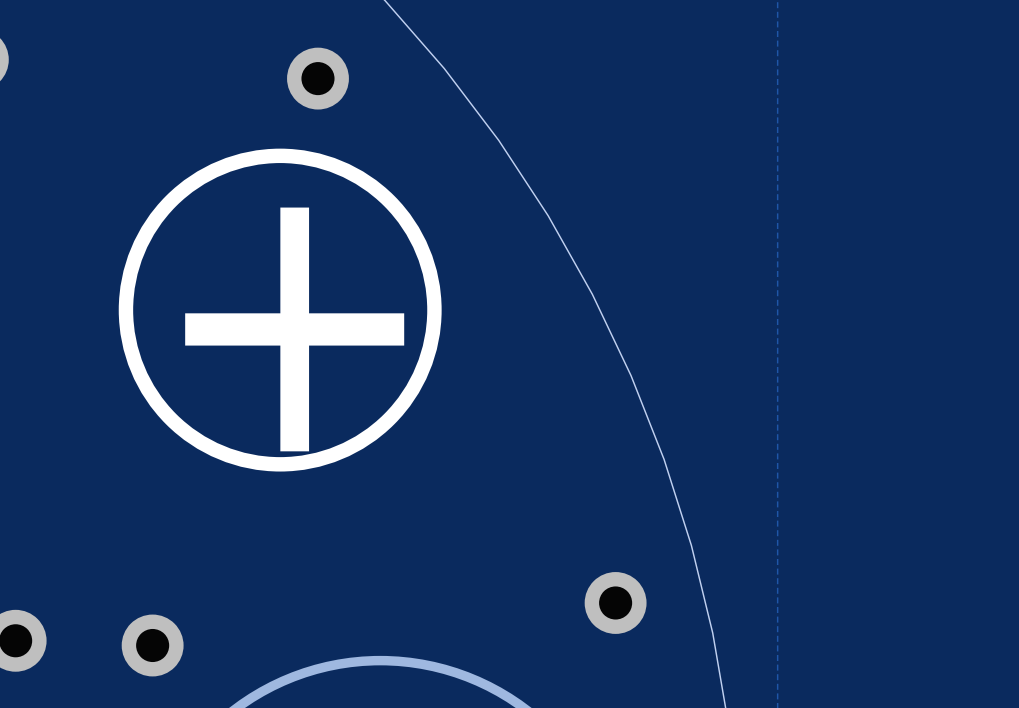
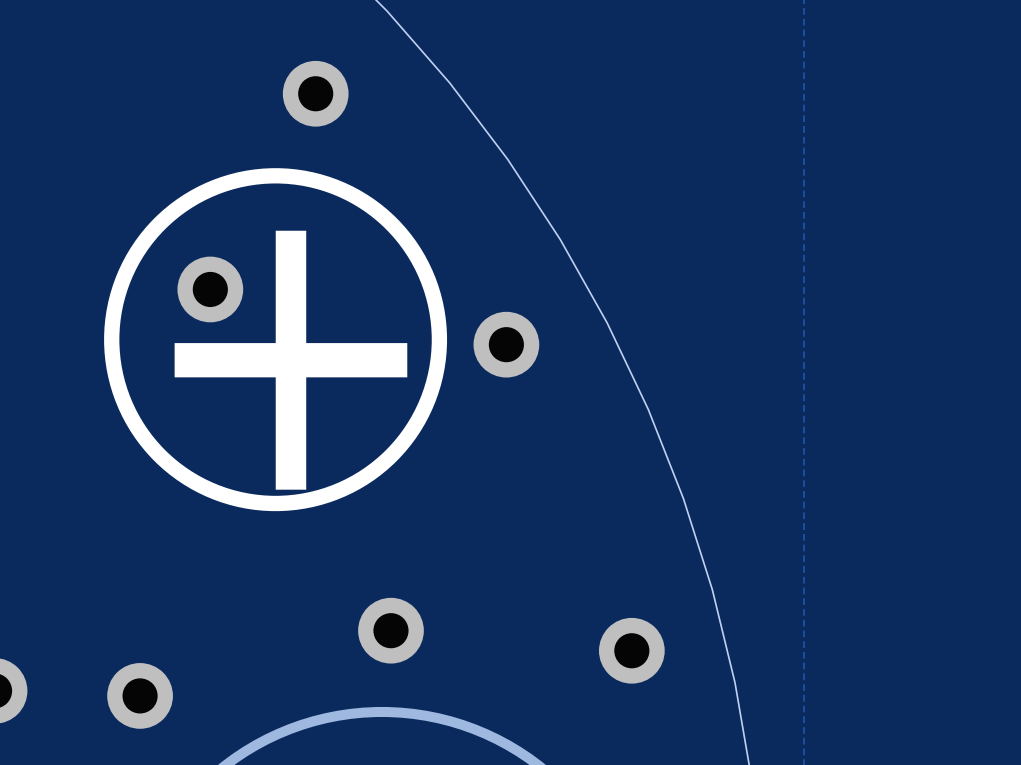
via: none -> (210, 289)
via: none -> (506, 344)
via: none -> (390, 630)

